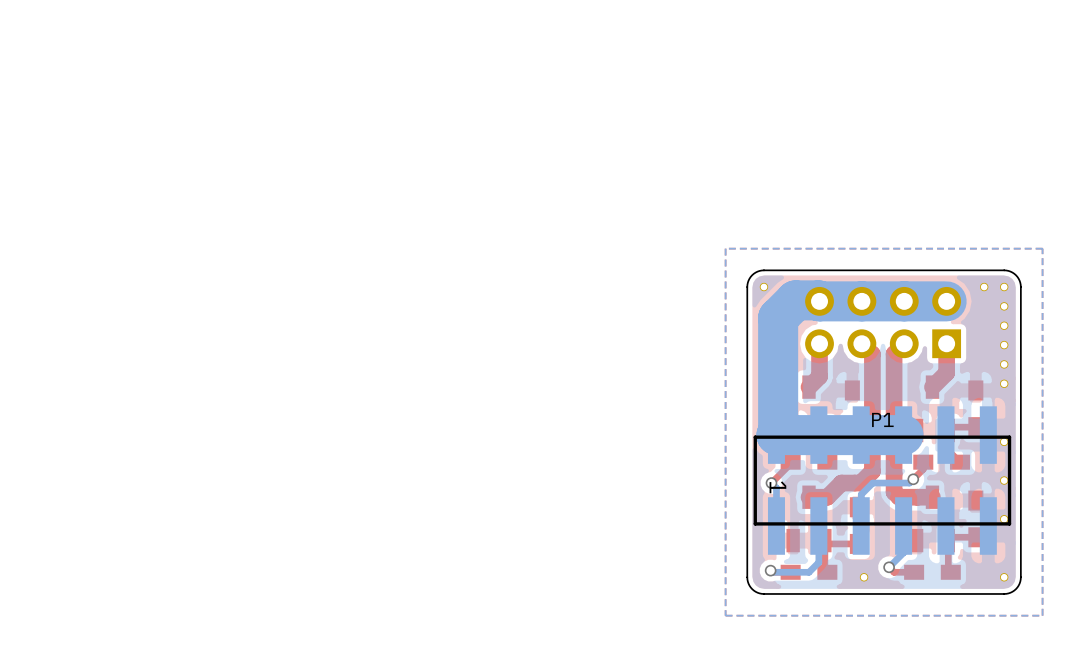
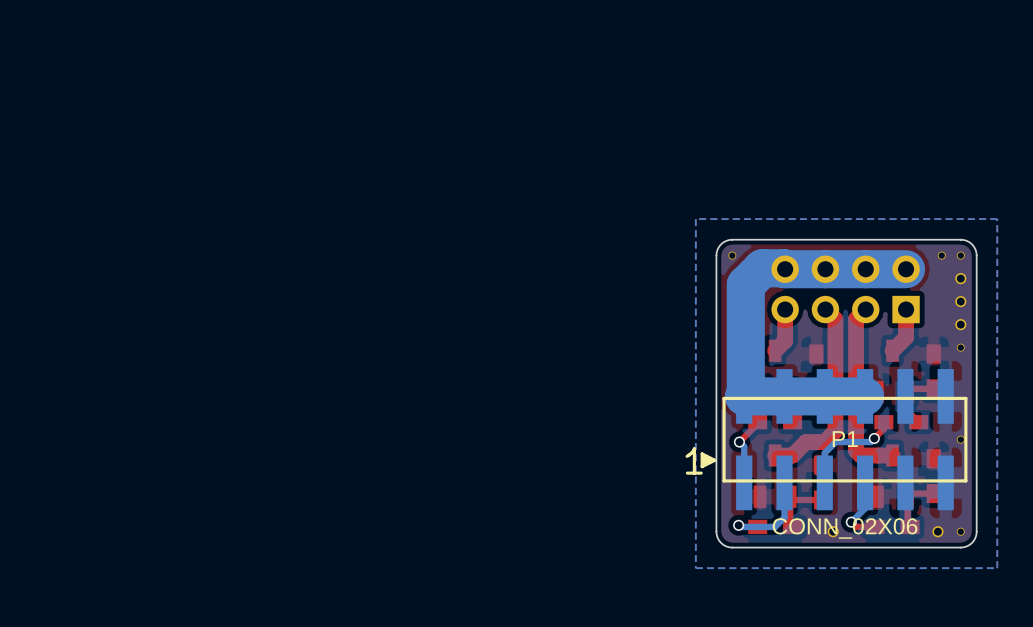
part footprint: [1000, 302, 1009, 311] -> [955, 273, 967, 285]
part: (1004, 325) -> none
part: none -> (960, 301)
part: (1004, 345) -> none
part footprint: [1000, 360, 1009, 369] -> [955, 319, 967, 331]
P1 footprint: [753, 406, 1012, 555] -> [685, 369, 968, 511]
P1 name position: P1 (882, 419) -> P1 (845, 439)
part: (1004, 441) -> none
part: (1004, 519) -> none
part footprint: [859, 573, 869, 582] -> [827, 526, 839, 538]
P1 value: none -> CONN_02X06 (845, 528)
part: none -> (937, 531)

